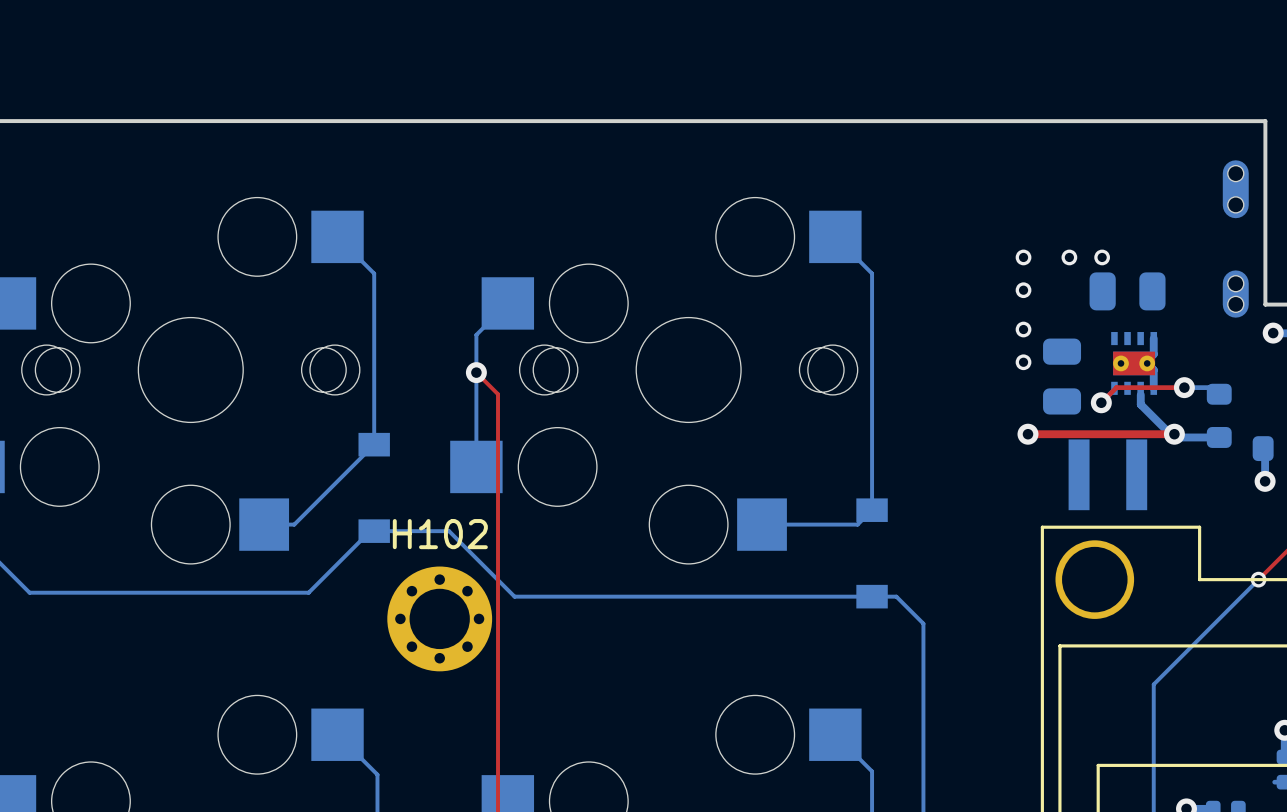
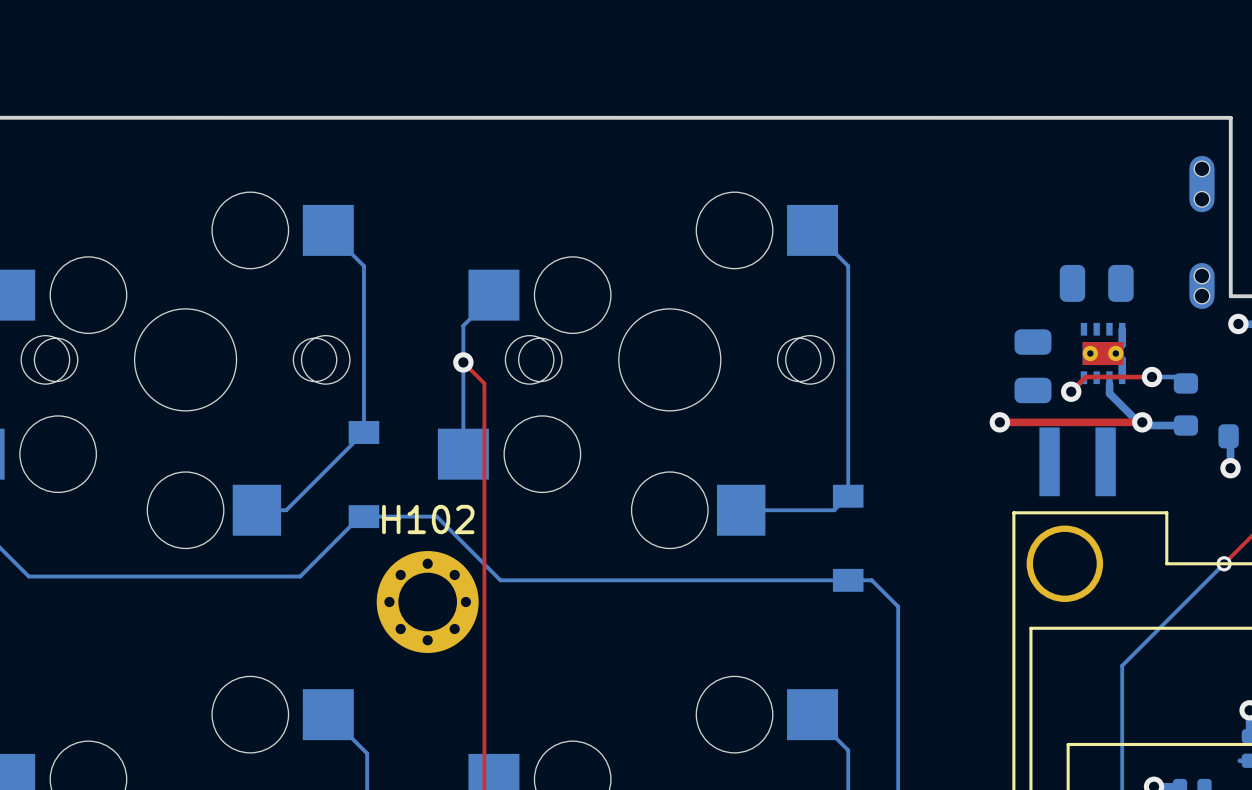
via: (1023, 257) -> none
via: (1069, 257) -> none
via: (1102, 257) -> none
via: (1023, 290) -> none
via: (1023, 329) -> none
via: (1023, 362) -> none

